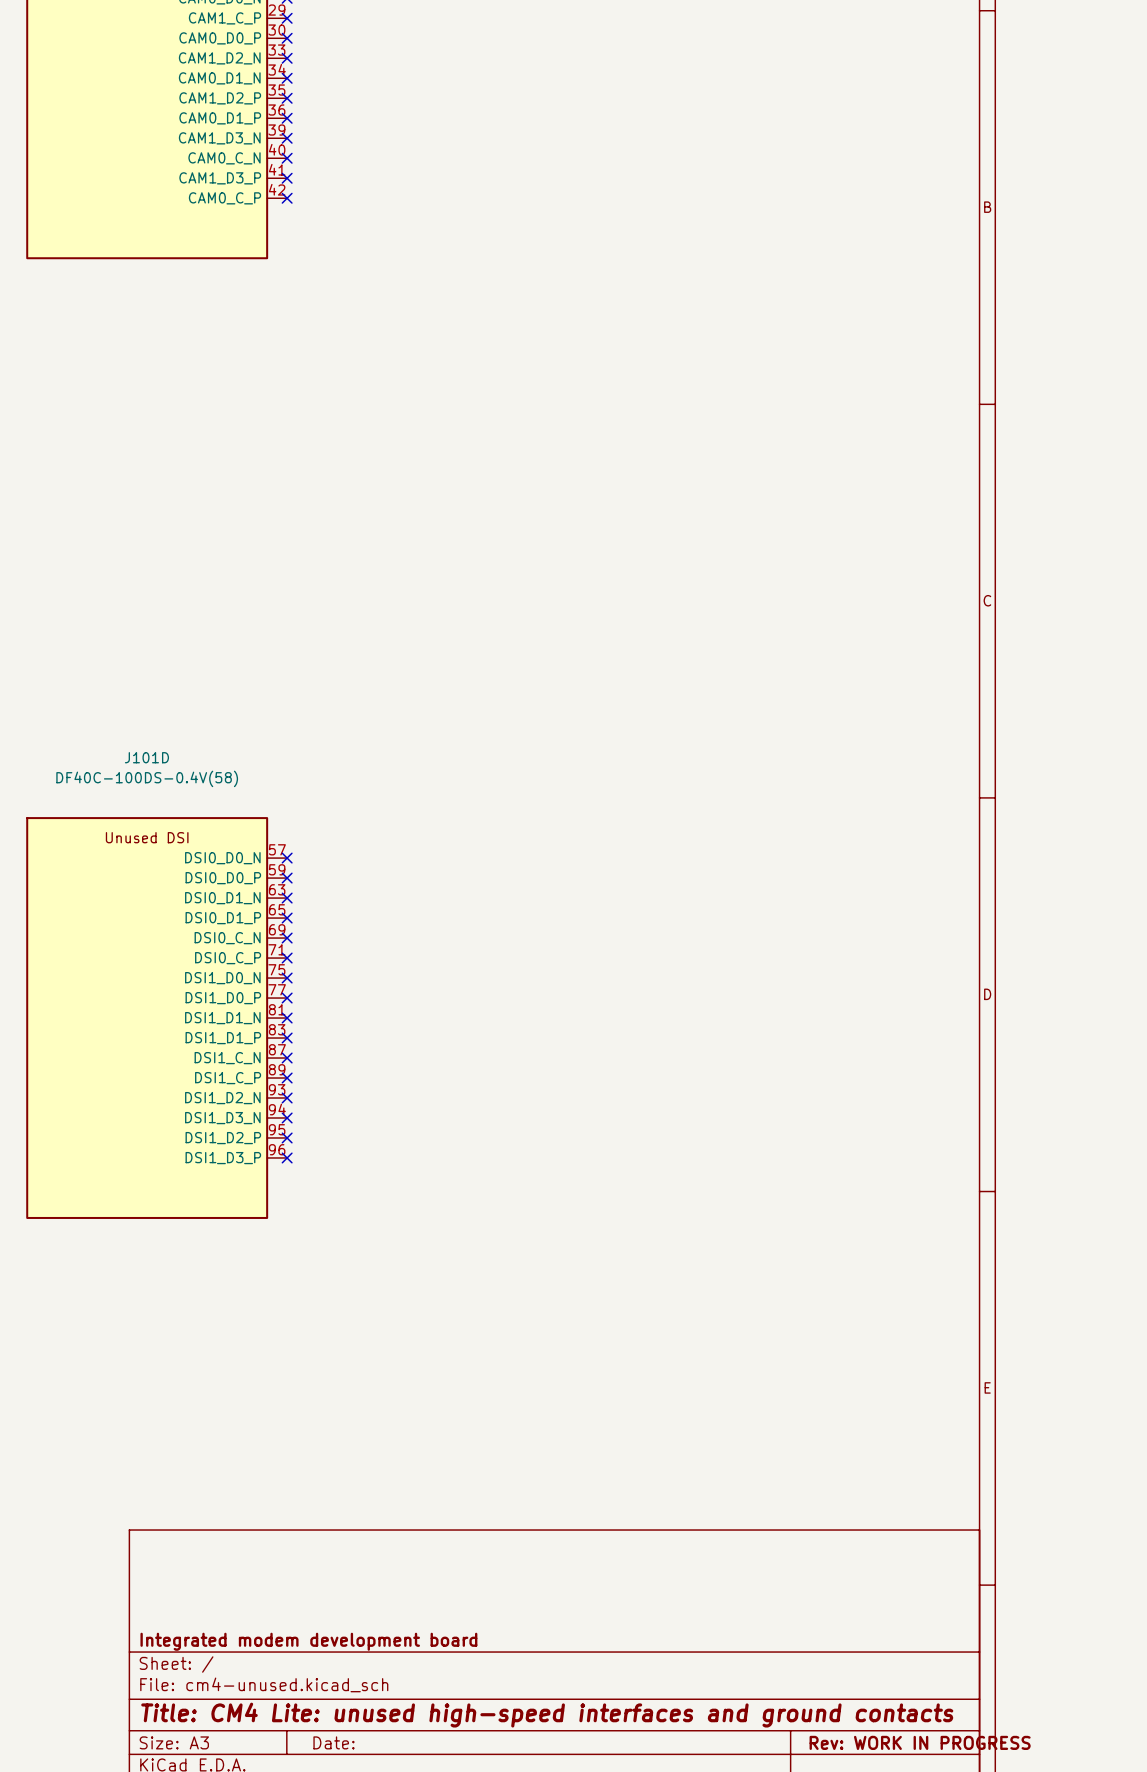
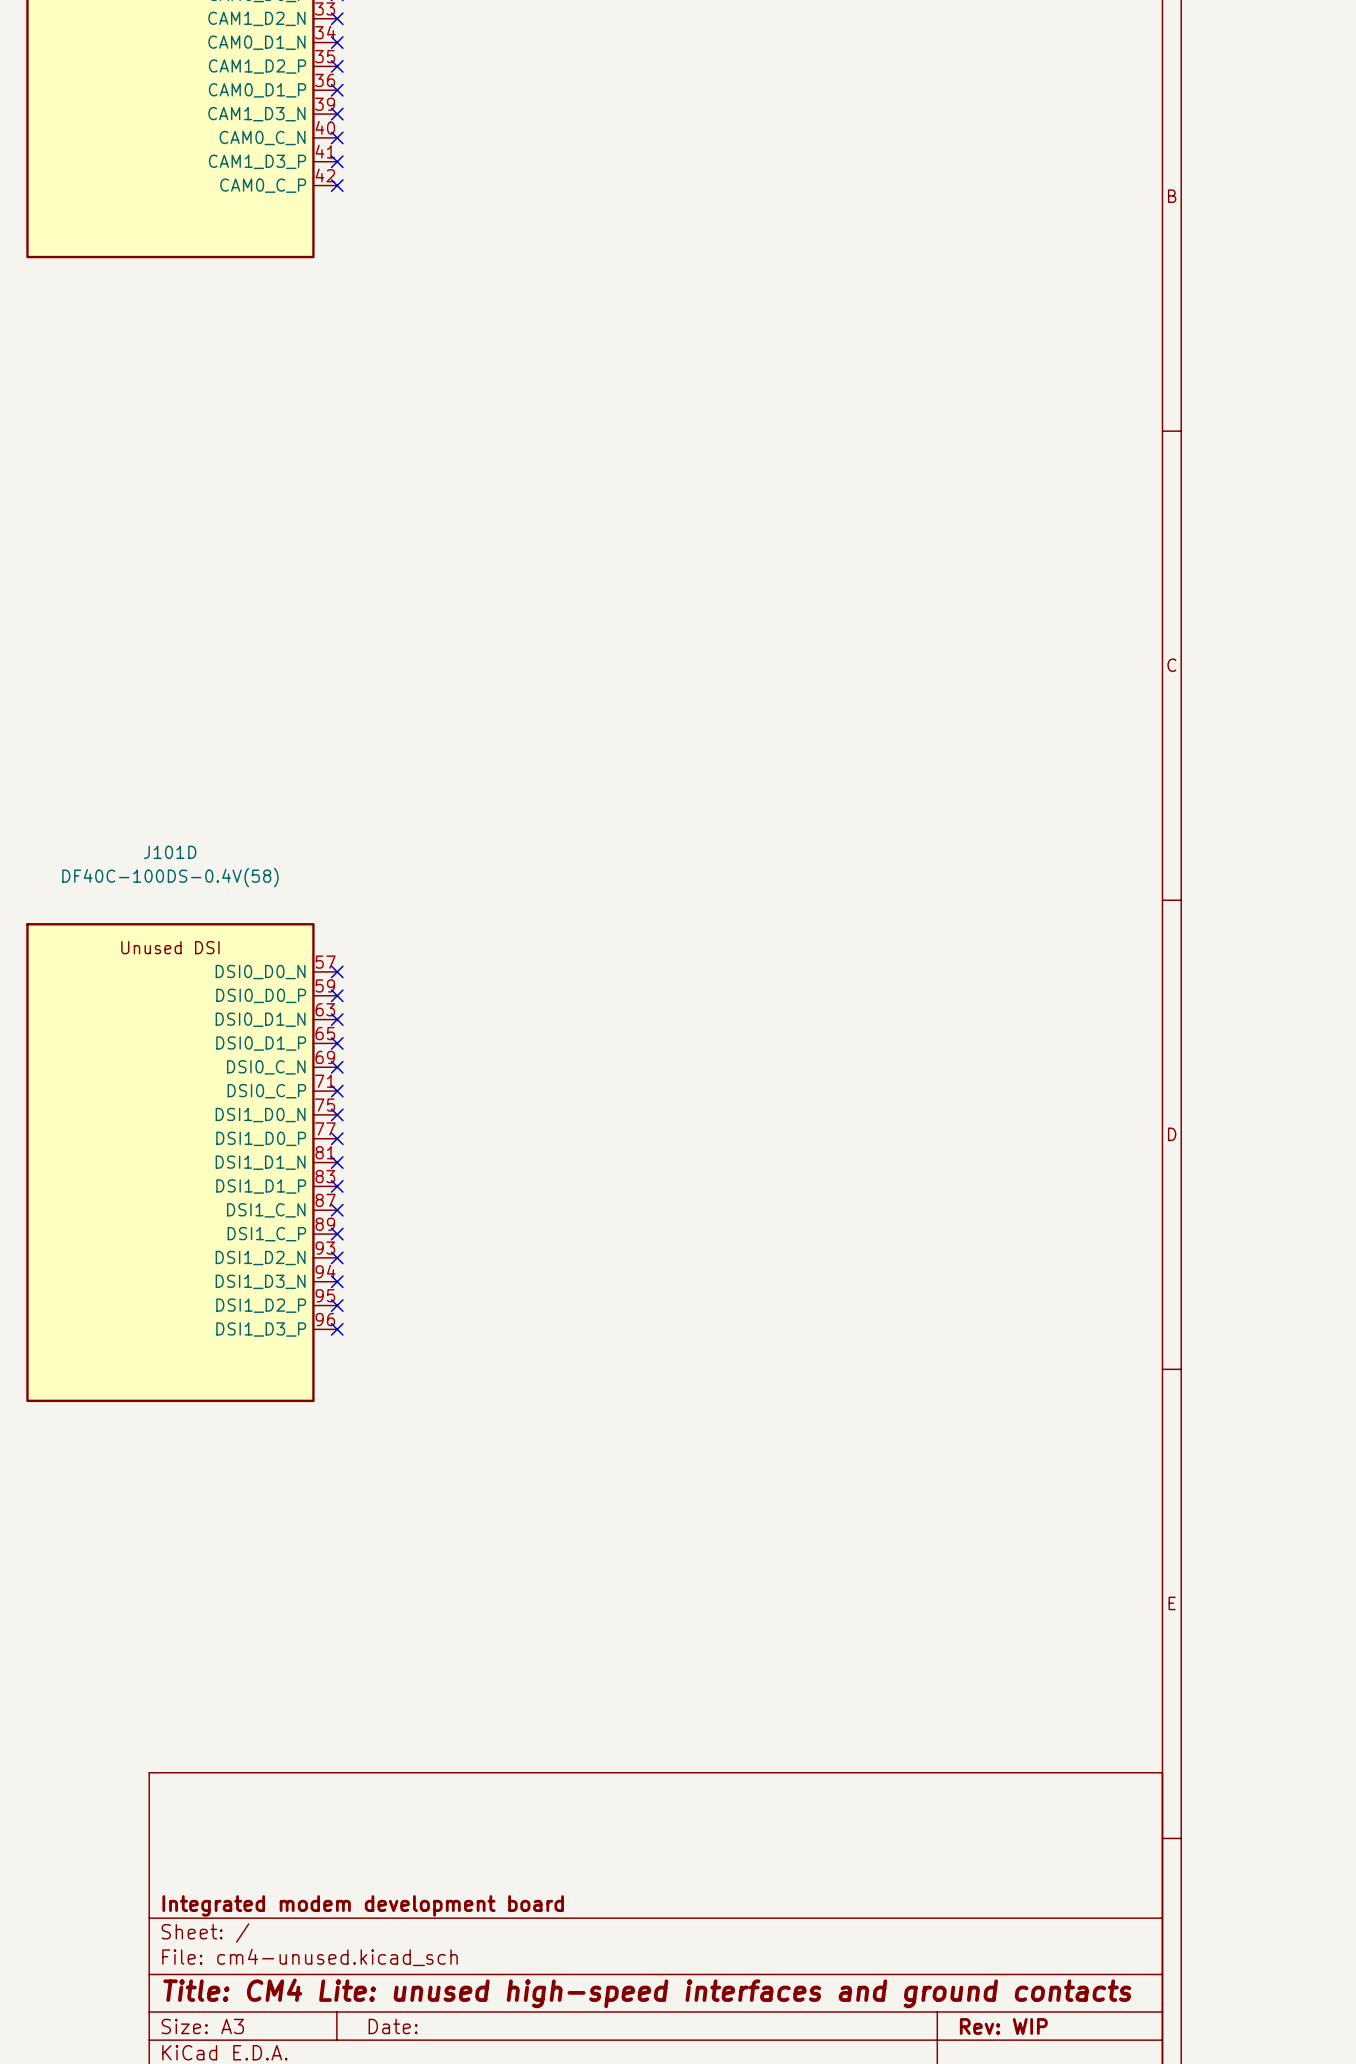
title block: Rev: WORK IN PROGRESS (920, 1742) -> Rev: WIP (1003, 2026)

